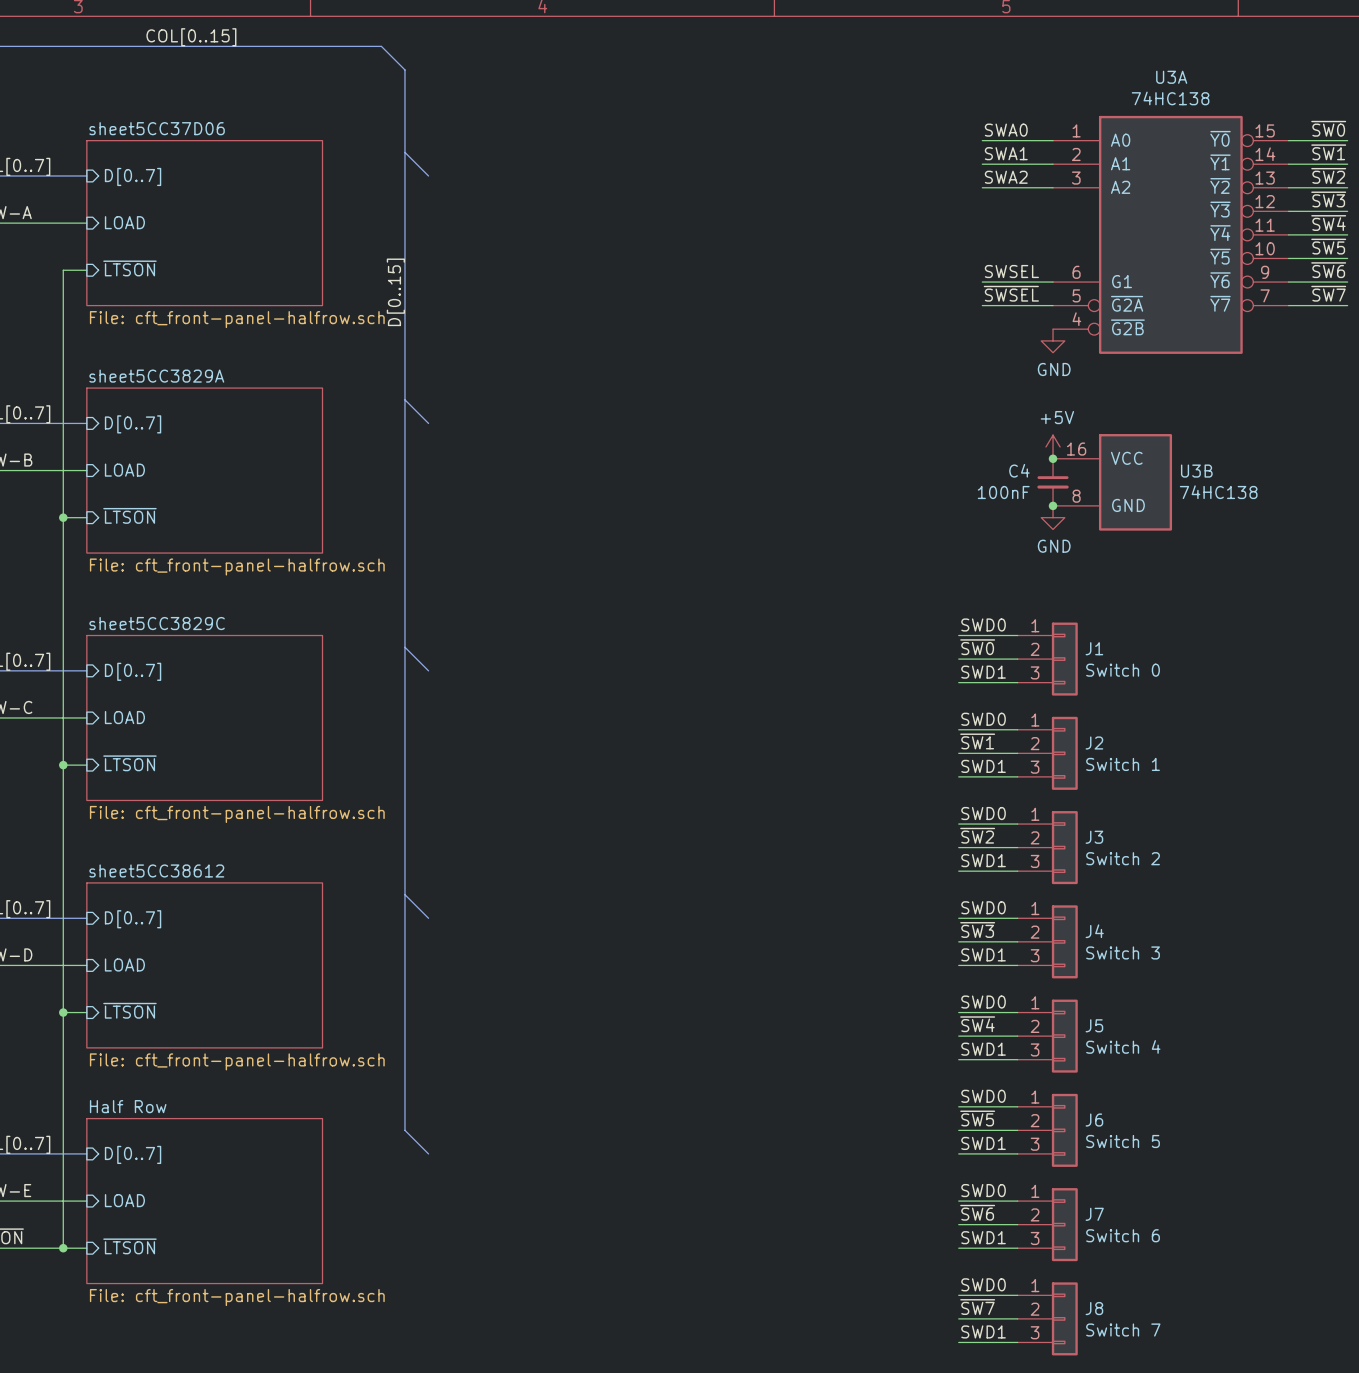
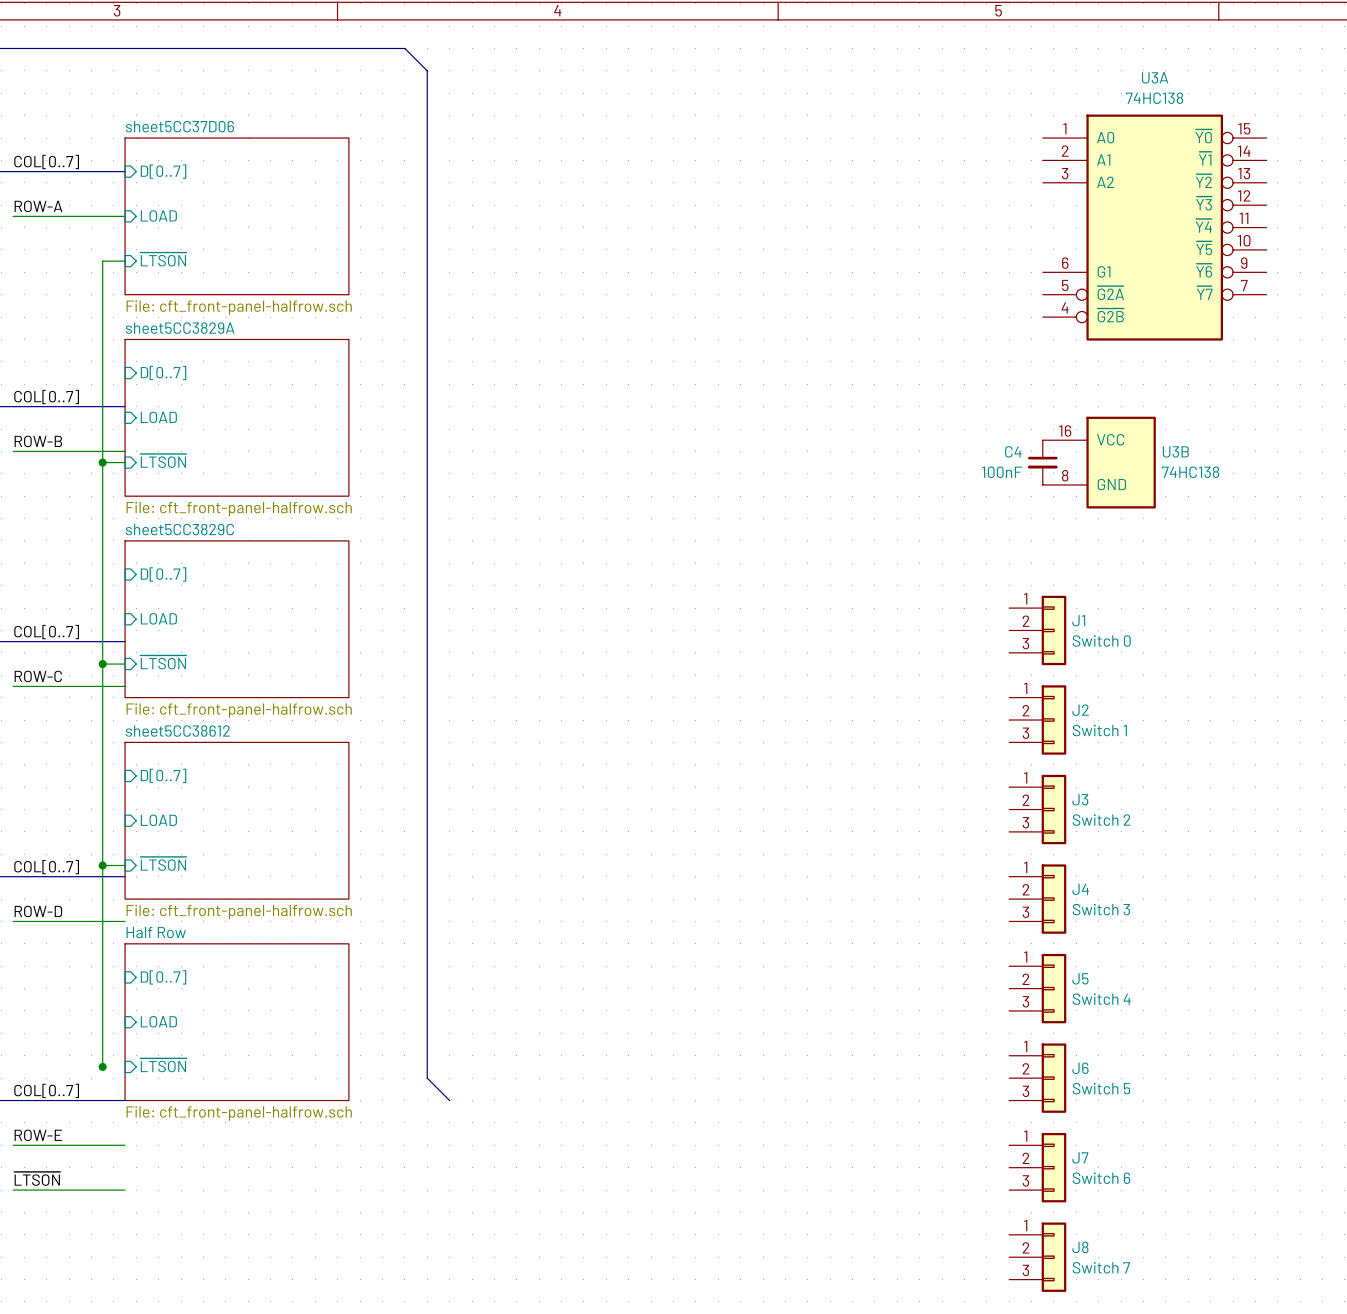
label: COL[0..15] (191, 37) -> none
label: ~{SW0} (1328, 128) -> none
label: SWA0 (1006, 130) -> none
wire: (982, 140) (1053, 140) -> none
wire: (1288, 140) (1347, 140) -> none
bus: (404, 152) (428, 175) -> none
label: ~{SW1} (1328, 152) -> none
label: SWA1 (1006, 153) -> none
wire: (982, 164) (1053, 164) -> none
wire: (1288, 164) (1347, 164) -> none
label: ~{SW2} (1328, 175) -> none
label: SWA2 (1006, 177) -> none
wire: (982, 187) (1053, 187) -> none
wire: (1288, 187) (1347, 187) -> none
label: ~{SW3} (1328, 199) -> none
wire: (1288, 211) (1347, 211) -> none
label: ~{SW4} (1328, 223) -> none
wire: (1288, 234) (1347, 234) -> none
label: ~{SW5} (1328, 246) -> none
wire: (1288, 258) (1347, 258) -> none
label: ~{SW6} (1328, 270) -> none
label: SWSEL (1011, 271) -> none
wire: (982, 282) (1053, 282) -> none
wire: (1288, 282) (1347, 282) -> none
label: D[0..15] (395, 292) -> none
label: ~{SWSEL} (1011, 293) -> none
label: ~{SW7} (1328, 293) -> none
wire: (982, 305) (1053, 305) -> none
wire: (1288, 305) (1347, 305) -> none
power symbol: GND (1053, 340) -> none
bus: (404, 399) (428, 423) -> none
sheet pin position: D[0..7] (133, 424) -> D[0..7] (163, 373)
power symbol: +5V (1053, 446) -> none
junction: (1053, 458) -> none
sheet pin position: LOAD (124, 470) -> LOAD (158, 417)
sheet sheet5CC3829A position: (204, 470) -> (236, 417)
junction: (1053, 505) -> none
sheet pin position: ~{LTSON} (129, 515) -> ~{LTSON} (163, 460)
wire: (63, 517) (86, 517) -> (102, 462) (125, 462)
junction position: (63, 517) -> (102, 462)
power symbol: GND (1053, 517) -> none
sheet pin: none -> D[0..7] (163, 574)
label: SWD0 (983, 624) -> none
wire: (958, 635) (1017, 635) -> none
sheet pin: none -> LOAD (158, 618)
bus: (404, 647) (428, 670) -> none
label: ~{SW0} (977, 647) -> none
wire: (958, 659) (1017, 659) -> none
sheet pin: D[0..7] (133, 671) -> none
label: SWD1 (983, 672) -> none
wire: (958, 682) (1017, 682) -> none
sheet pin: none -> ~{LTSON} (163, 662)
junction: none -> (102, 664)
sheet pin: LOAD (124, 717) -> none
sheet sheet5CC3829C position: (204, 717) -> (236, 619)
label: SWD0 (983, 719) -> none
wire: (958, 729) (1017, 729) -> none
label: ~{SW1} (977, 741) -> none
wire: (958, 753) (1017, 753) -> none
sheet pin: ~{LTSON} (129, 763) -> none
wire: (63, 765) (86, 765) -> (102, 664) (125, 664)
junction: (63, 765) -> none
label: SWD1 (983, 766) -> none
wire: (958, 776) (1017, 776) -> none
sheet pin: none -> D[0..7] (163, 775)
label: SWD0 (983, 813) -> none
wire: (958, 824) (1017, 824) -> none
label: ~{SW2} (977, 835) -> none
wire: (958, 847) (1017, 847) -> none
sheet pin: none -> LOAD (158, 820)
label: SWD1 (983, 860) -> none
wire: (958, 871) (1017, 871) -> none
bus: (404, 894) (428, 918) -> none
sheet pin: none -> ~{LTSON} (163, 863)
junction: none -> (102, 865)
label: SWD0 (983, 907) -> none
wire: (958, 918) (1017, 918) -> none
sheet pin: D[0..7] (133, 919) -> none
label: ~{SW3} (977, 929) -> none
wire: (958, 941) (1017, 941) -> none
label: SWD1 (983, 954) -> none
sheet pin: LOAD (124, 964) -> none
sheet sheet5CC38612 position: (204, 965) -> (236, 820)
wire: (958, 965) (1017, 965) -> none
label: SWD0 (983, 1002) -> none
sheet pin: ~{LTSON} (129, 1010) -> none
wire: (63, 1012) (86, 1012) -> (102, 865) (125, 865)
junction: (63, 1012) -> none
wire: (958, 1012) (1017, 1012) -> none
label: ~{SW4} (977, 1024) -> none
sheet pin: none -> D[0..7] (163, 977)
wire: (958, 1036) (1017, 1036) -> none
label: SWD1 (983, 1049) -> none
wire: (958, 1059) (1017, 1059) -> none
sheet pin: none -> LOAD (158, 1021)
label: SWD0 (983, 1096) -> none
wire: (958, 1106) (1017, 1106) -> none
sheet pin: none -> ~{LTSON} (163, 1065)
wire: (63, 1118) (63, 1248) -> none
junction: none -> (102, 1066)
label: ~{SW5} (977, 1118) -> none
wire: (958, 1130) (1017, 1130) -> none
label: SWD1 (983, 1143) -> none
wire: (958, 1153) (1017, 1153) -> none
sheet pin: D[0..7] (133, 1154) -> none
label: SWD0 (983, 1190) -> none
sheet pin: LOAD (124, 1200) -> none
sheet Half Row position: (204, 1201) -> (236, 1022)
wire: (958, 1201) (1017, 1201) -> none
label: ~{SW6} (977, 1212) -> none
wire: (958, 1224) (1017, 1224) -> none
label: SWD1 (983, 1237) -> none
sheet pin: ~{LTSON} (129, 1246) -> none
junction: (63, 1248) -> none
wire: (958, 1248) (1017, 1248) -> none
label: SWD0 (983, 1284) -> none
wire: (958, 1295) (1017, 1295) -> none
label: ~{SW7} (977, 1307) -> none
wire: (958, 1318) (1017, 1318) -> none
label: SWD1 (983, 1331) -> none
wire: (958, 1342) (1017, 1342) -> none

